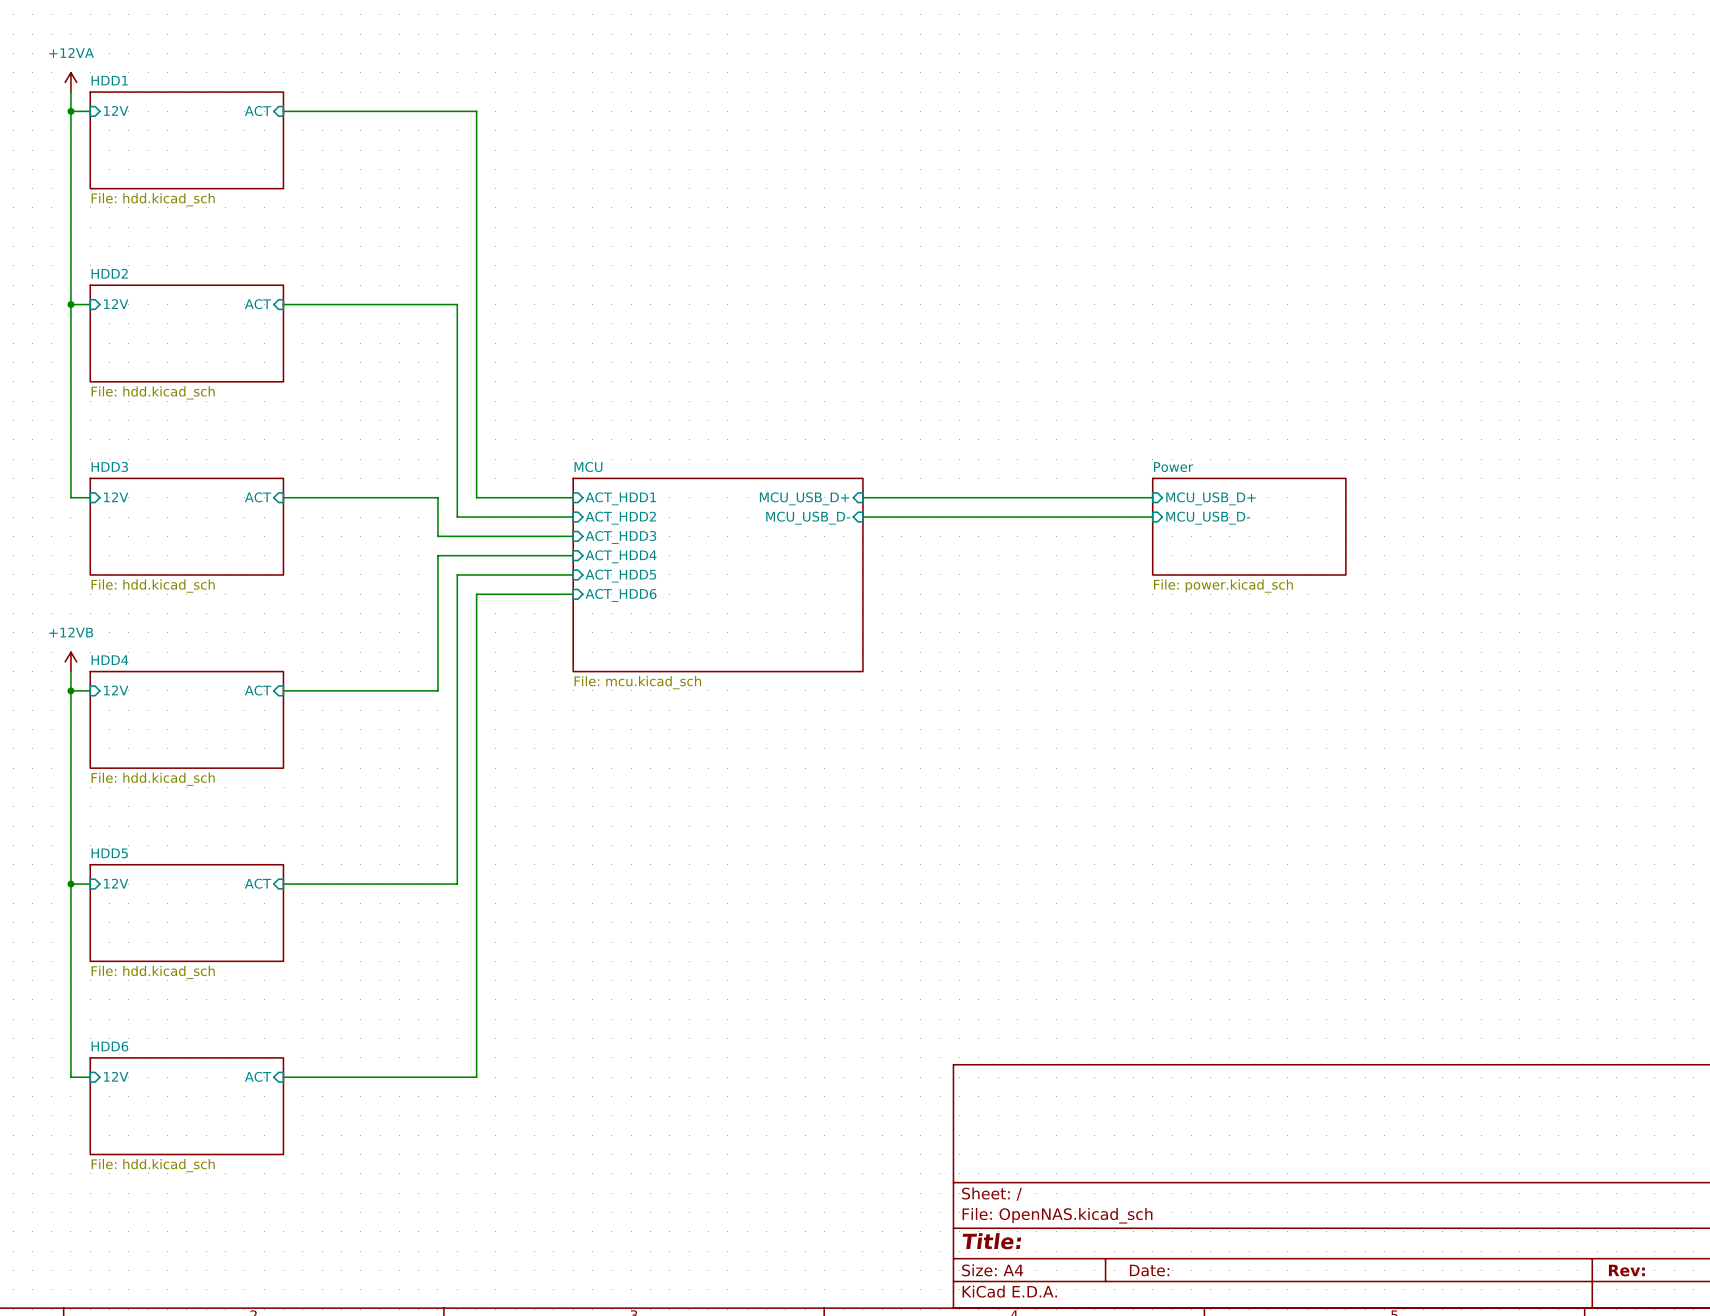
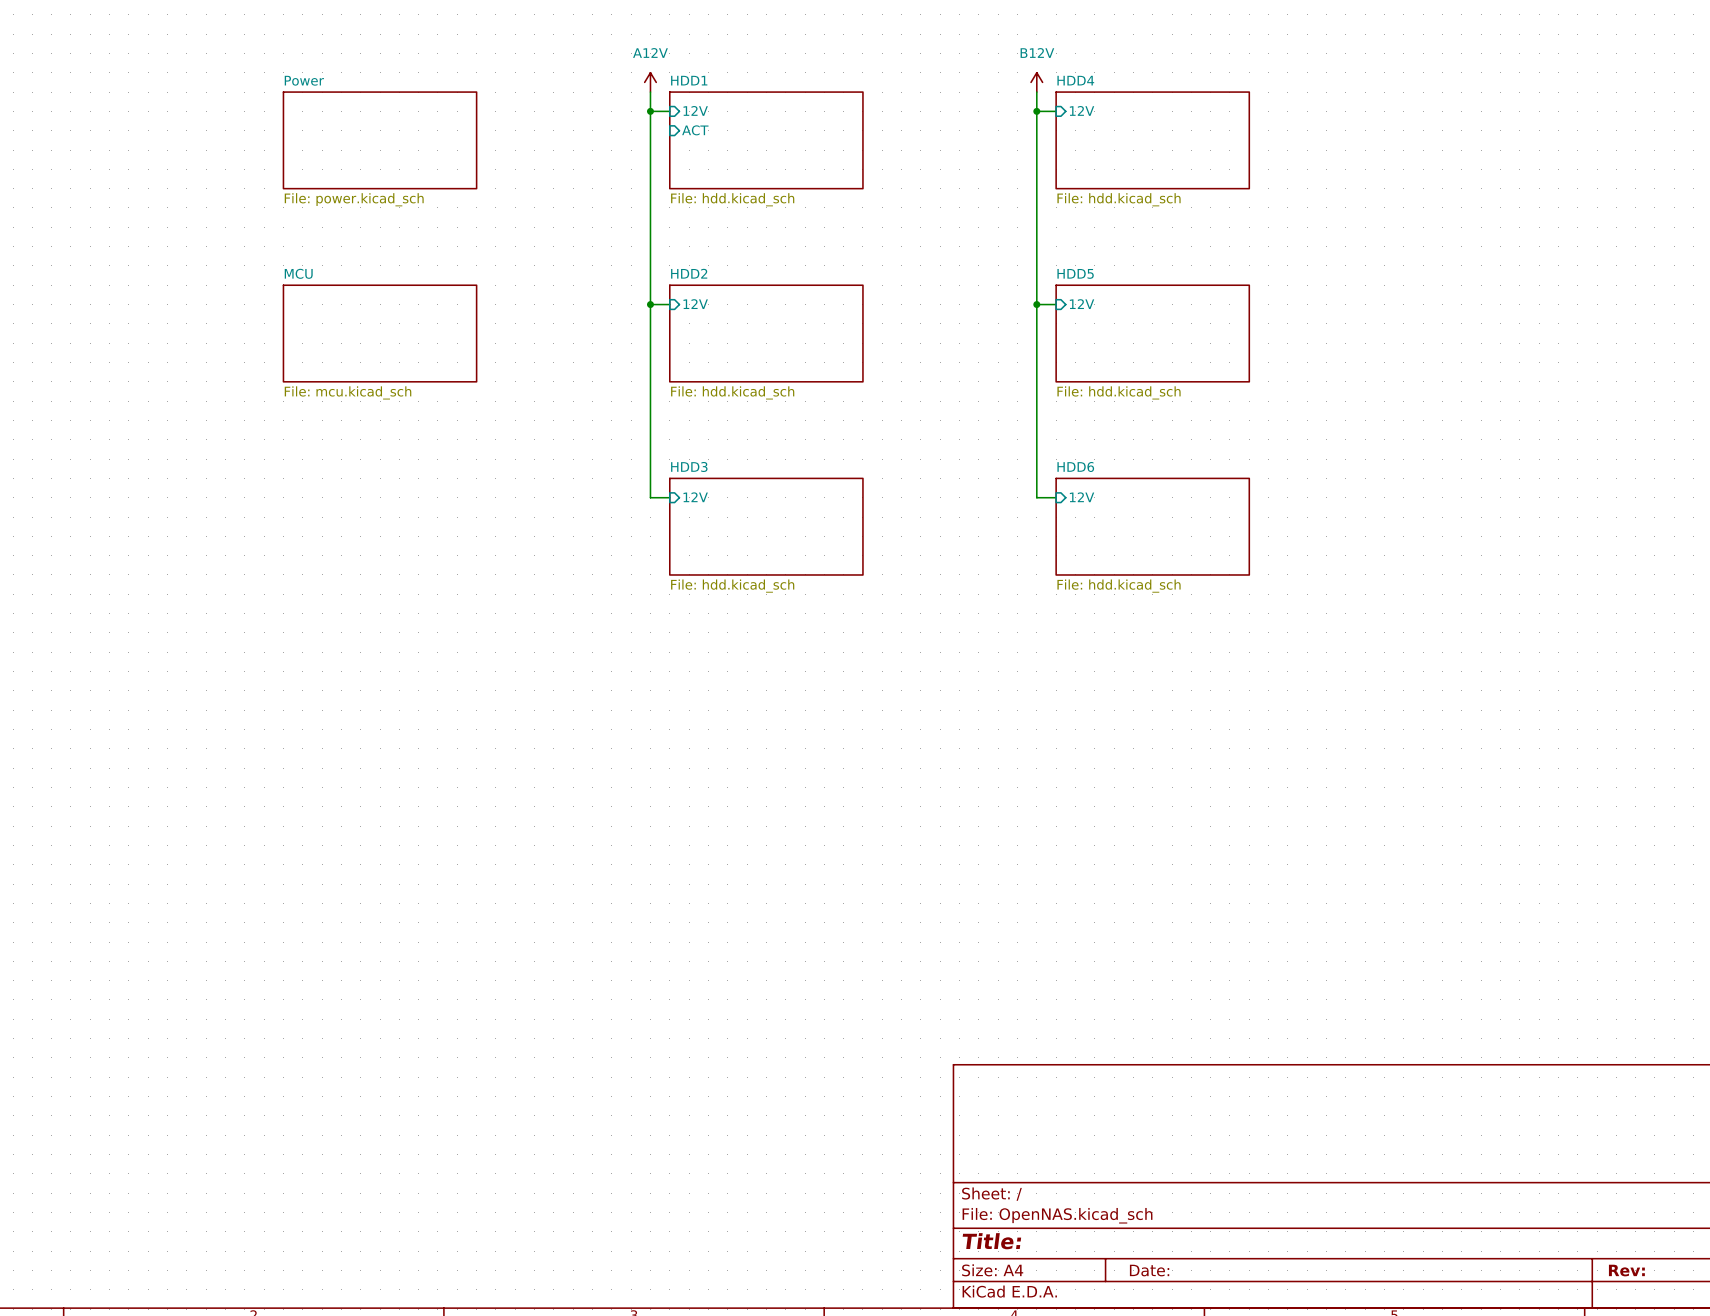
power symbol: +12VA (70, 82) -> none
power symbol: none -> A12V (650, 82)
power symbol: none -> B12V (1036, 82)
wire: (70, 92) (70, 497) (90, 497) -> none
wire: none -> (650, 92) (650, 497) (669, 497)
sheet pin: 12V (116, 110) -> none
sheet pin: none -> 12V (695, 110)
sheet pin: none -> 12V (1082, 110)
wire: (70, 111) (90, 111) -> none
junction: (70, 111) -> none
sheet pin: ACT (258, 111) -> none
wire: (283, 111) (476, 111) (476, 497) (573, 497) -> none
wire: none -> (650, 111) (669, 111)
junction: none -> (650, 111)
wire: none -> (1036, 111) (1056, 111)
junction: none -> (1036, 111)
sheet pin: none -> ACT (695, 130)
sheet HDD1 position: (186, 140) -> (766, 140)
sheet Power: none -> File: power.kicad_sch (380, 140)
wire: (70, 304) (90, 304) -> none
junction: (70, 304) -> none
sheet pin: 12V (116, 304) -> none
sheet pin: ACT (258, 304) -> none
wire: (283, 304) (457, 304) (457, 517) (573, 517) -> none
wire: none -> (650, 304) (669, 304)
junction: none -> (650, 304)
sheet pin: none -> 12V (695, 304)
wire: none -> (1036, 304) (1056, 304)
junction: none -> (1036, 304)
sheet pin: none -> 12V (1082, 304)
sheet HDD2 position: (186, 333) -> (766, 333)
sheet MCU: none -> File: mcu.kicad_sch (380, 333)
sheet pin: 12V (116, 497) -> none
sheet pin: ACT (258, 497) -> none
wire: (283, 497) (437, 497) (437, 536) (573, 536) -> none
sheet pin: none -> 12V (695, 497)
wire: (862, 497) (1036, 497) -> (1036, 92) (1036, 497)
wire: (1056, 497) (1152, 497) -> none
sheet pin: none -> 12V (1082, 497)
sheet pin: ACT_HDD1 (620, 498) -> none
sheet pin: MCU_USB_D+ (804, 498) -> none
sheet pin: MCU_USB_D+ (1210, 498) -> none
wire: (862, 517) (1152, 517) -> none
sheet pin: ACT_HDD2 (620, 518) -> none
sheet pin: MCU_USB_D- (808, 518) -> none
sheet pin: MCU_USB_D- (1208, 518) -> none
sheet HDD3 position: (186, 526) -> (766, 526)
sheet Power: File: power.kicad_sch (1249, 526) -> none
sheet pin: ACT_HDD3 (620, 537) -> none
wire: (573, 555) (437, 555) (437, 690) (283, 690) -> none
sheet pin: ACT_HDD4 (621, 556) -> none
wire: (573, 574) (457, 574) (457, 884) (283, 884) -> none
sheet MCU: File: mcu.kicad_sch (718, 574) -> none
sheet pin: ACT_HDD5 (620, 576) -> none
wire: (573, 594) (476, 594) (476, 1077) (283, 1077) -> none
sheet pin: ACT_HDD6 (621, 595) -> none
power symbol: +12VB (70, 661) -> none
wire: (70, 671) (70, 1077) (90, 1077) -> none
wire: (70, 690) (90, 690) -> none
junction: (70, 690) -> none
sheet pin: 12V (116, 690) -> none
sheet pin: ACT (258, 690) -> none
sheet HDD4 position: (186, 719) -> (1152, 140)
sheet pin: 12V (116, 883) -> none
sheet pin: ACT (258, 883) -> none
wire: (70, 884) (90, 884) -> none
junction: (70, 884) -> none
sheet HDD5 position: (186, 913) -> (1152, 333)
sheet pin: 12V (116, 1076) -> none
sheet pin: ACT (258, 1076) -> none
sheet HDD6 position: (186, 1106) -> (1152, 526)

